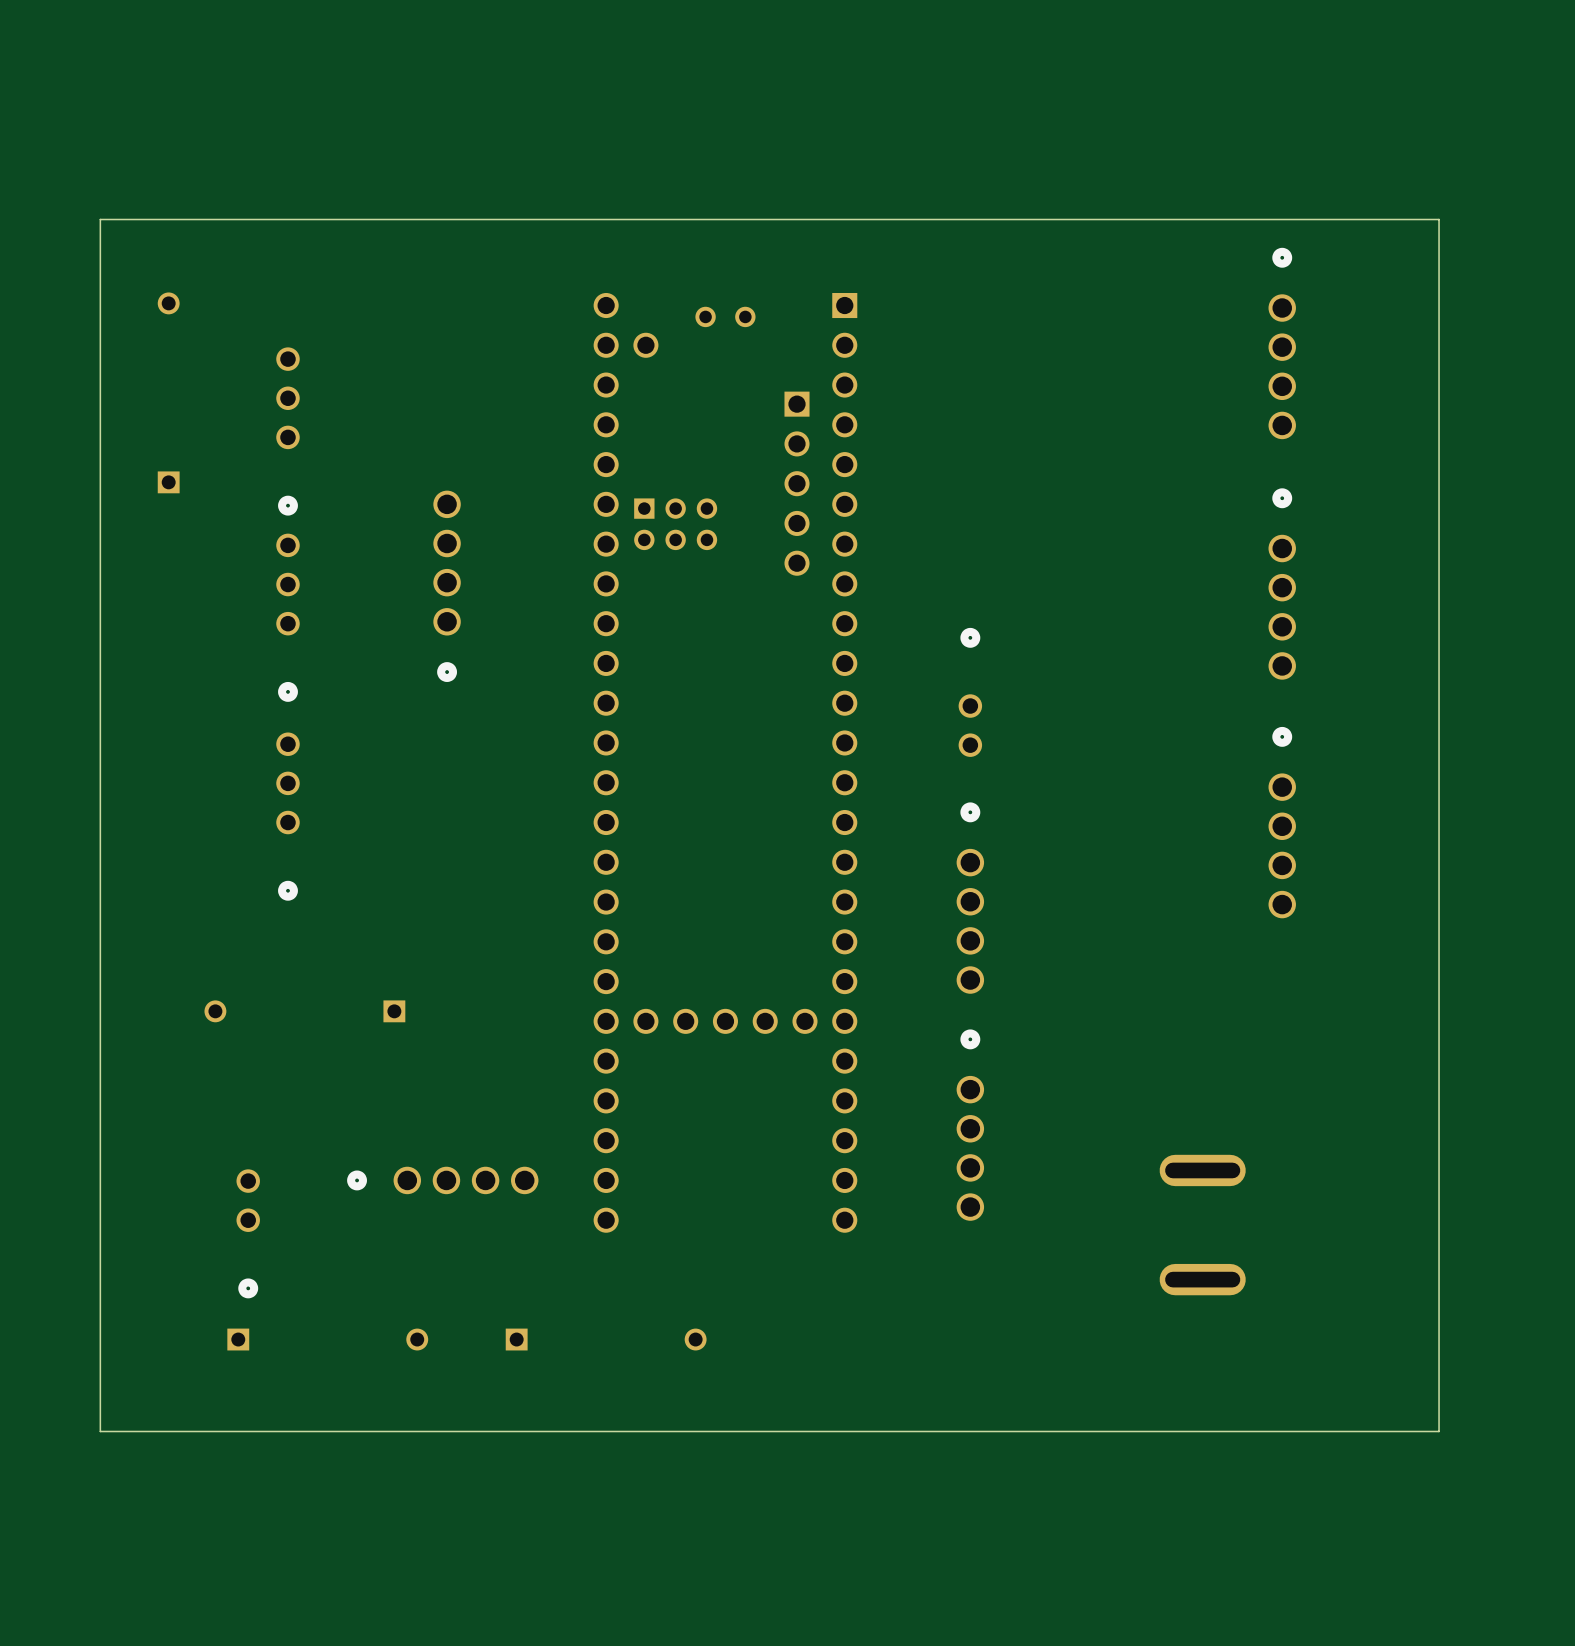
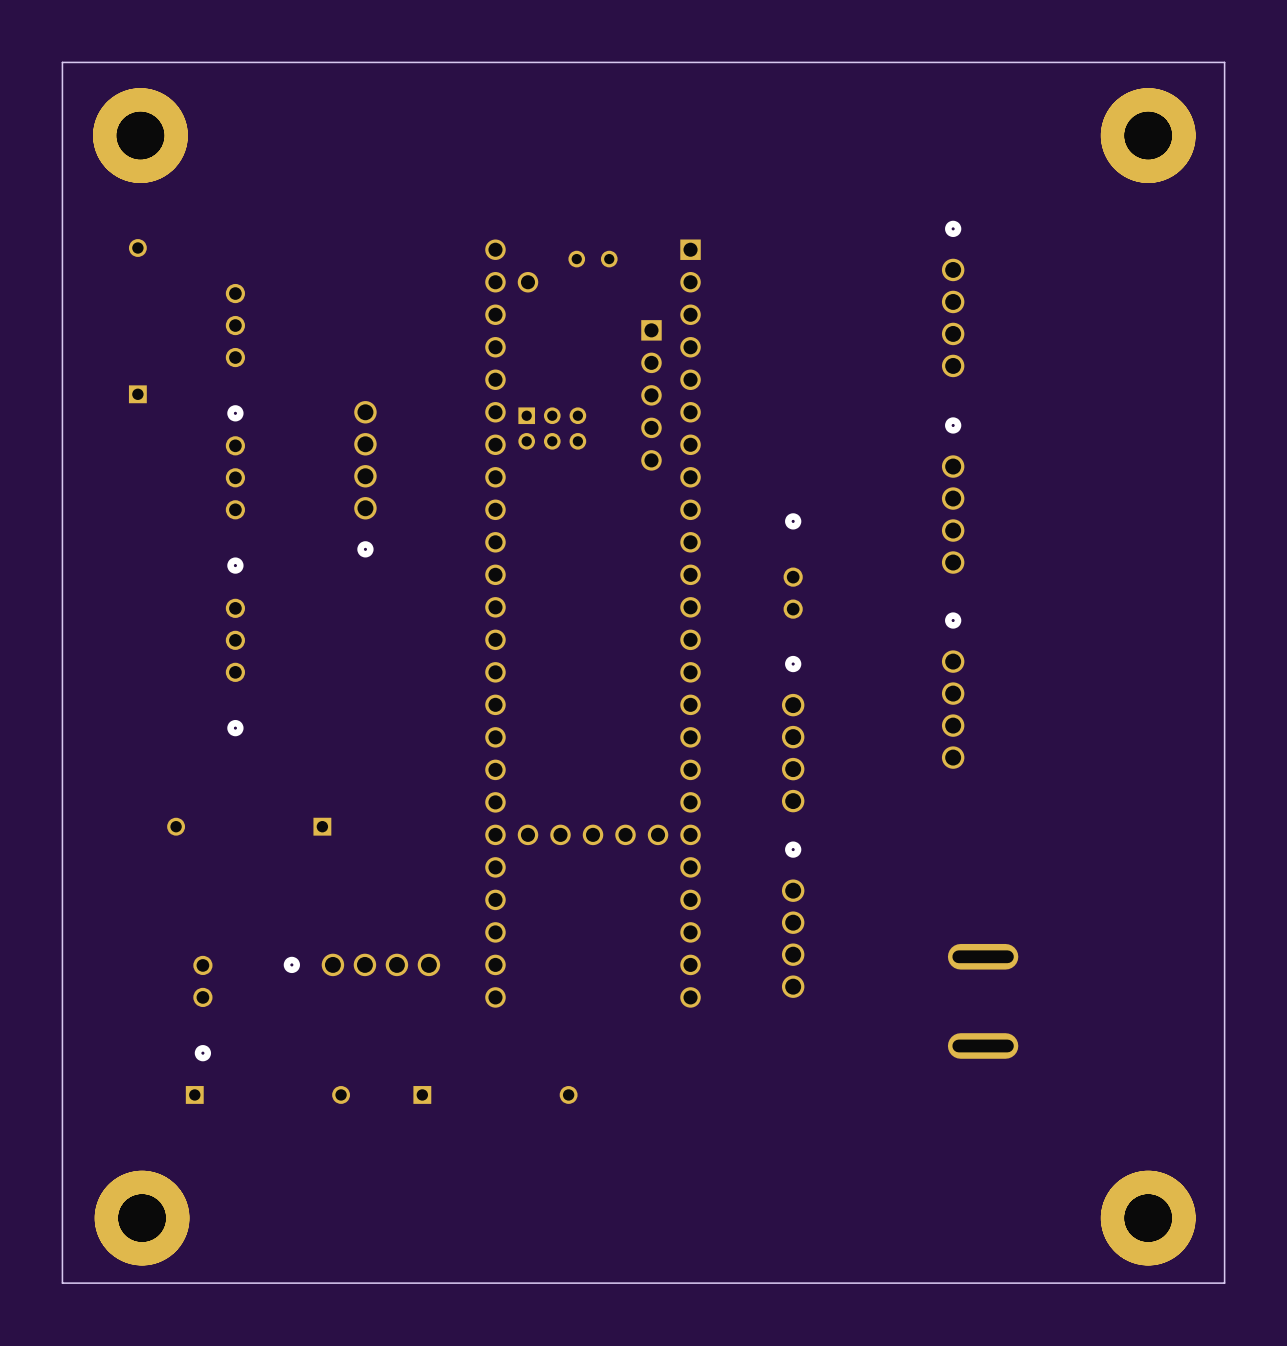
part: none -> (140, 135)
part: none -> (1148, 135)
board edge: (1439, 219) (100, 219) (100, 1431) (1439, 1431) (1439, 219) -> (1224, 62) (1224, 1283) (62, 1283) (62, 62) (1224, 62)
part position: (1282, 343) -> (953, 298)
part position: (1282, 583) -> (953, 495)
part position: (1282, 822) -> (953, 690)
part: none -> (142, 1218)
part: none -> (1148, 1218)

